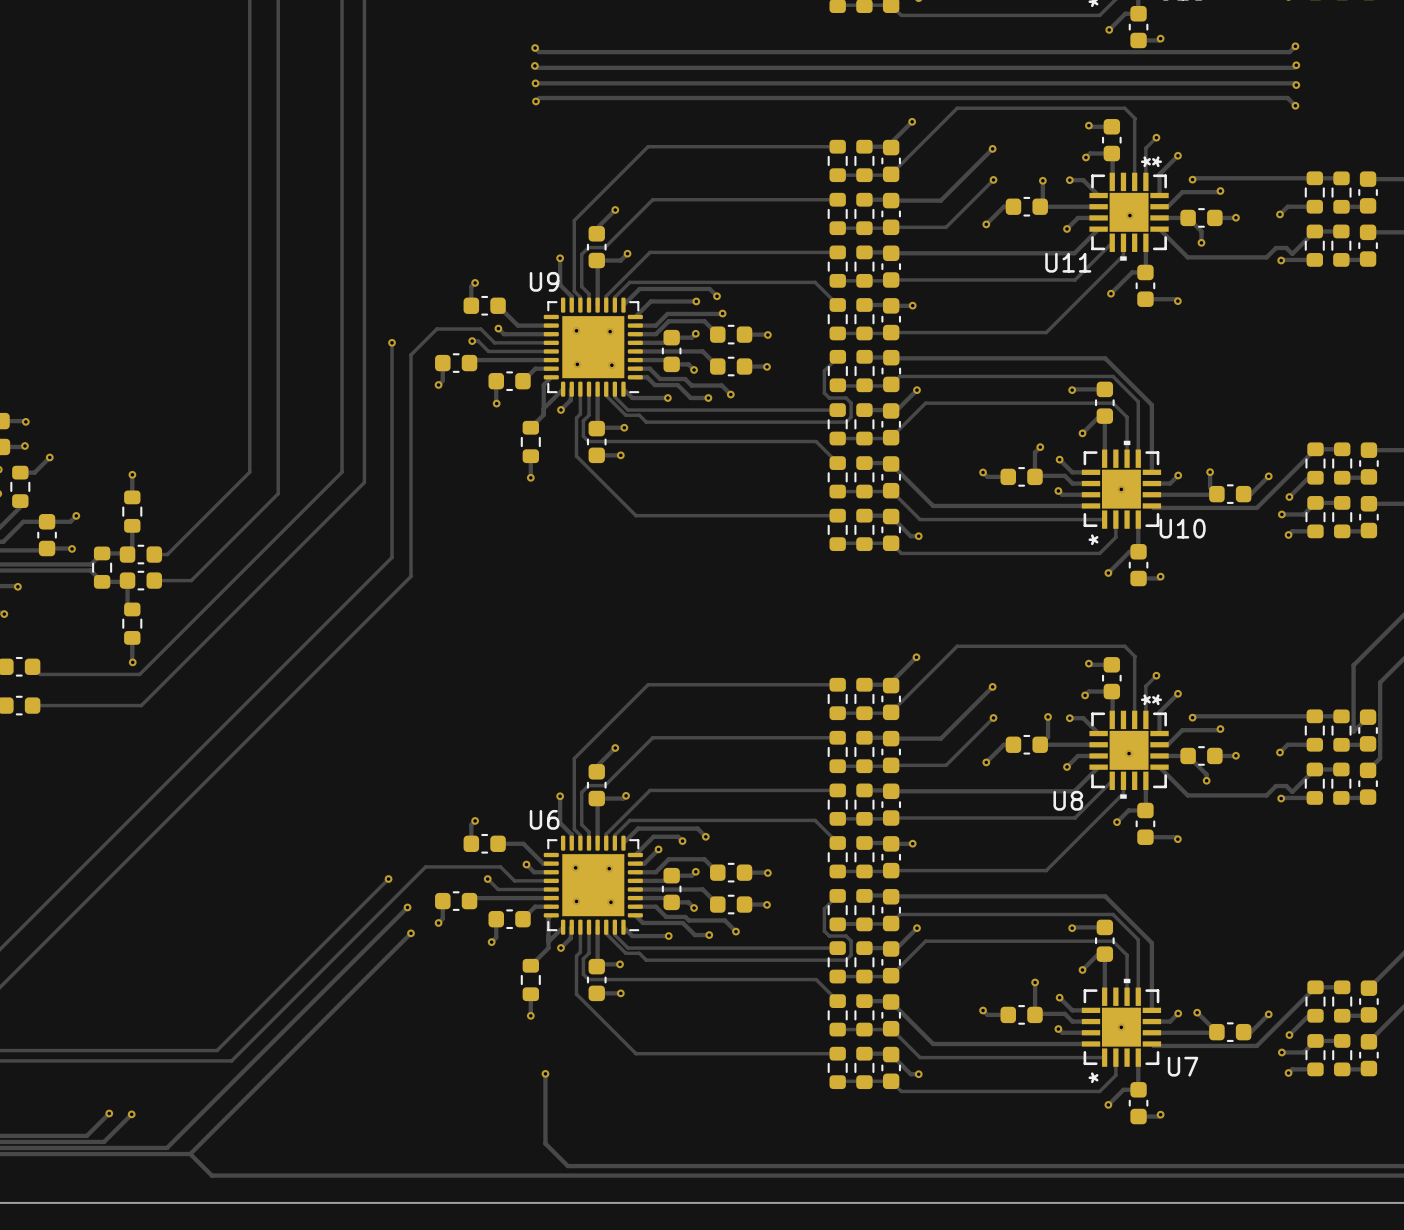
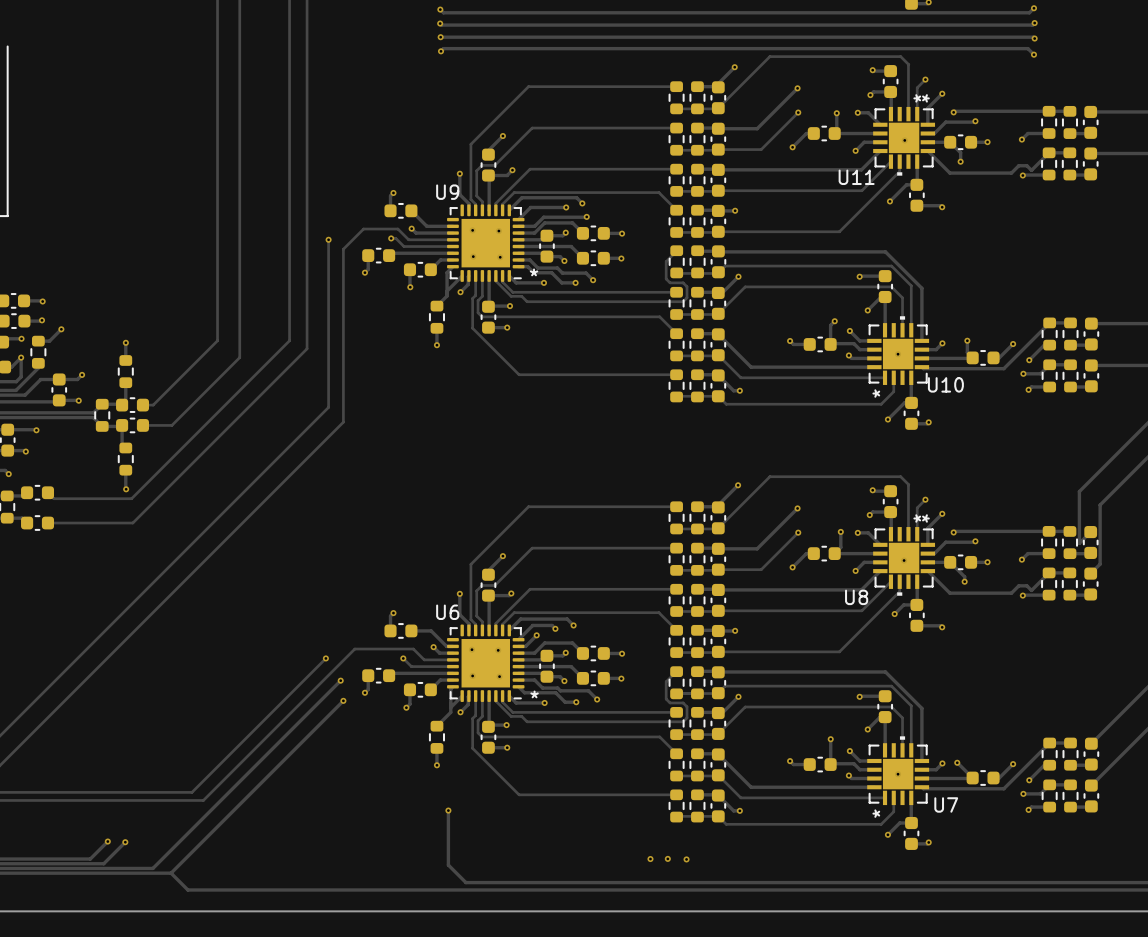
text: none -> * (534, 272)
text: none -> * (534, 694)
via: none -> (650, 859)
via: none -> (667, 858)
via: none -> (686, 859)

